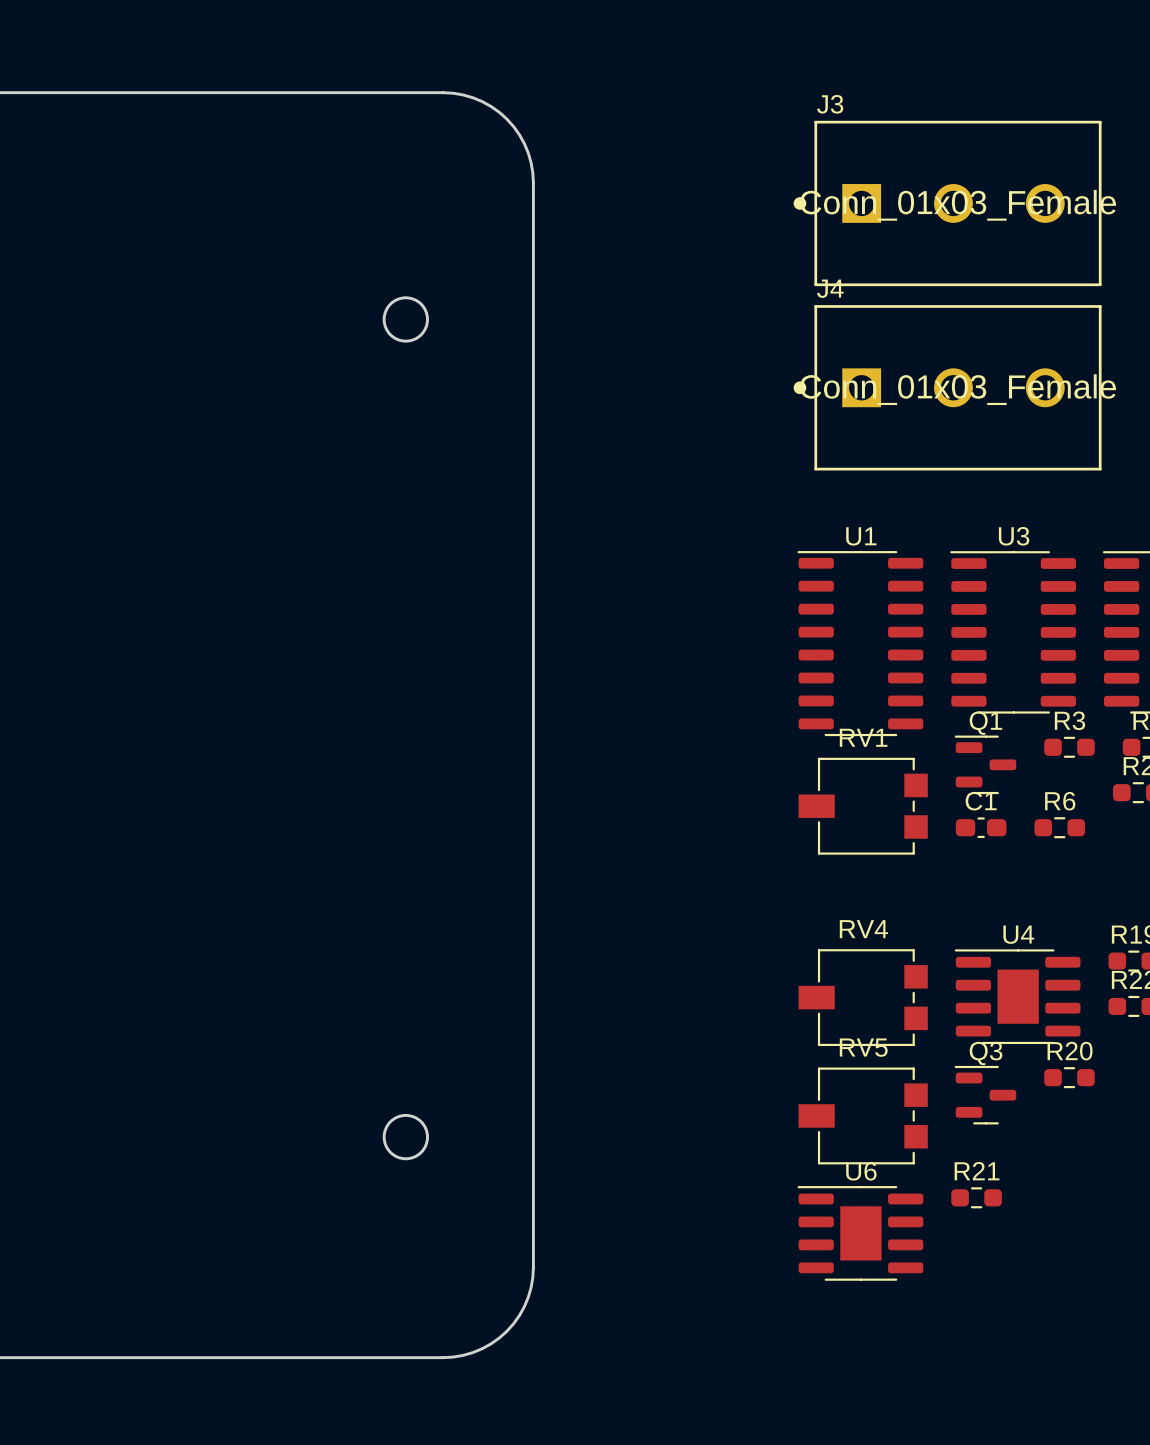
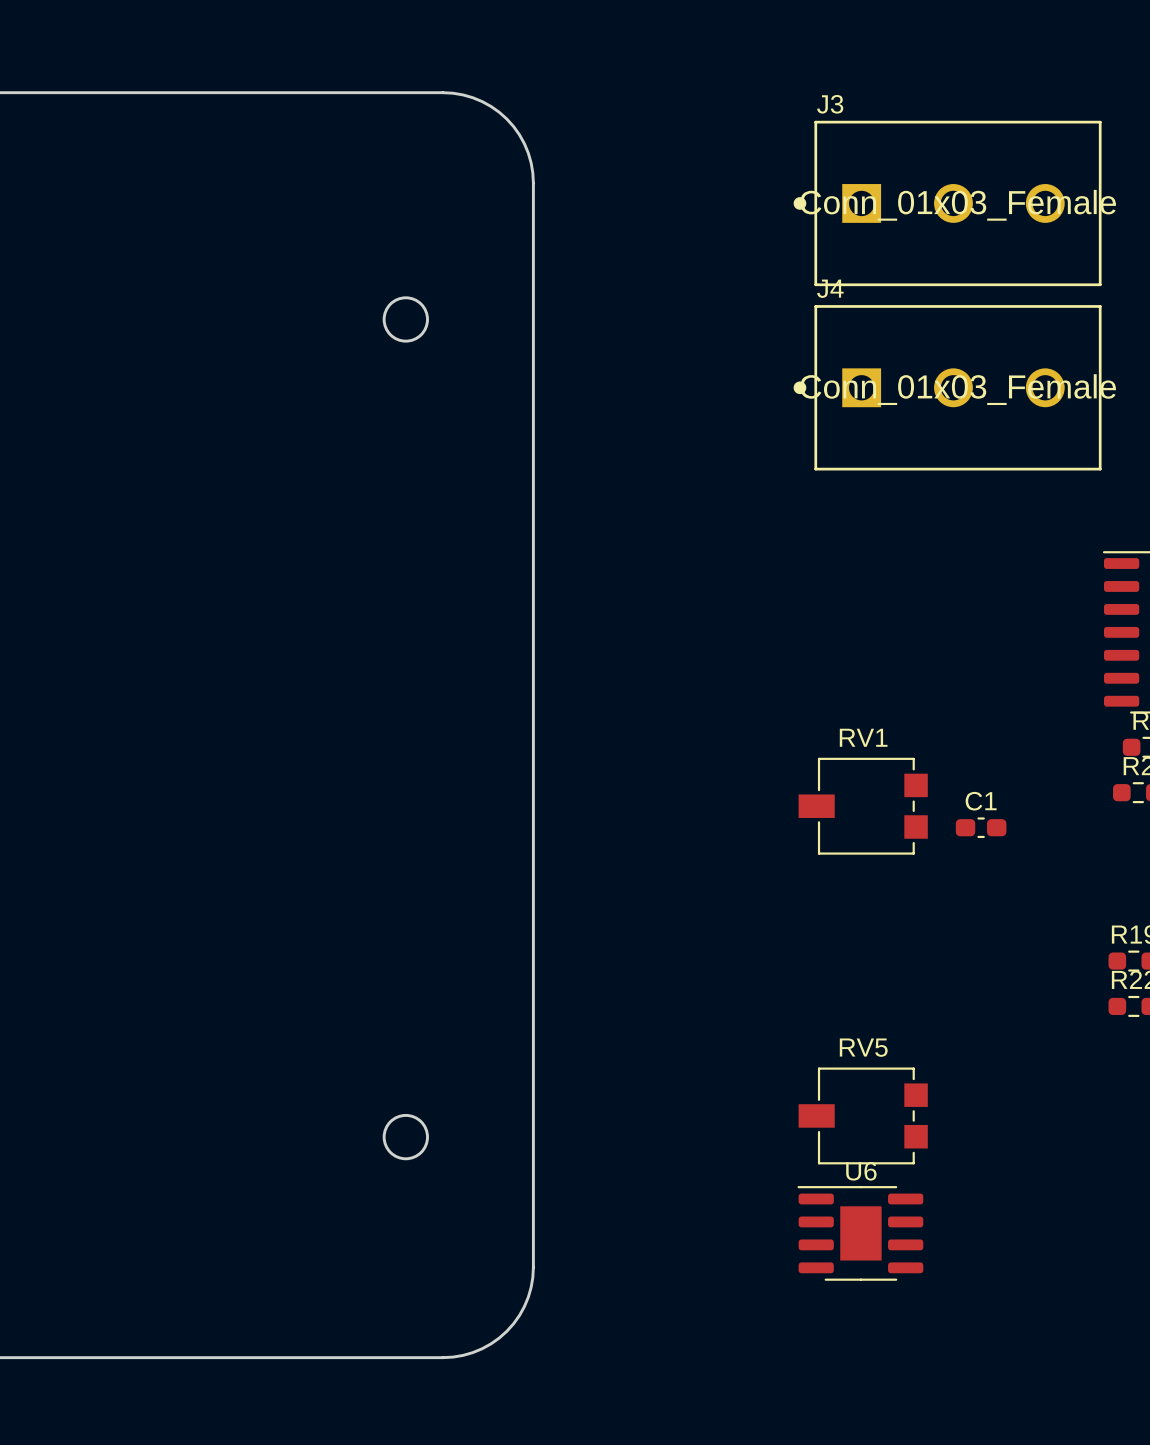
U3: (1013, 632) -> none
U1: (860, 643) -> none
R3: (1069, 747) -> none
Q1: (985, 764) -> none
R6: (1059, 827) -> none
U4: (1017, 996) -> none
RV4: (863, 997) -> none
R20: (1069, 1077) -> none
Q3: (985, 1095) -> none
R21: (976, 1197) -> none

